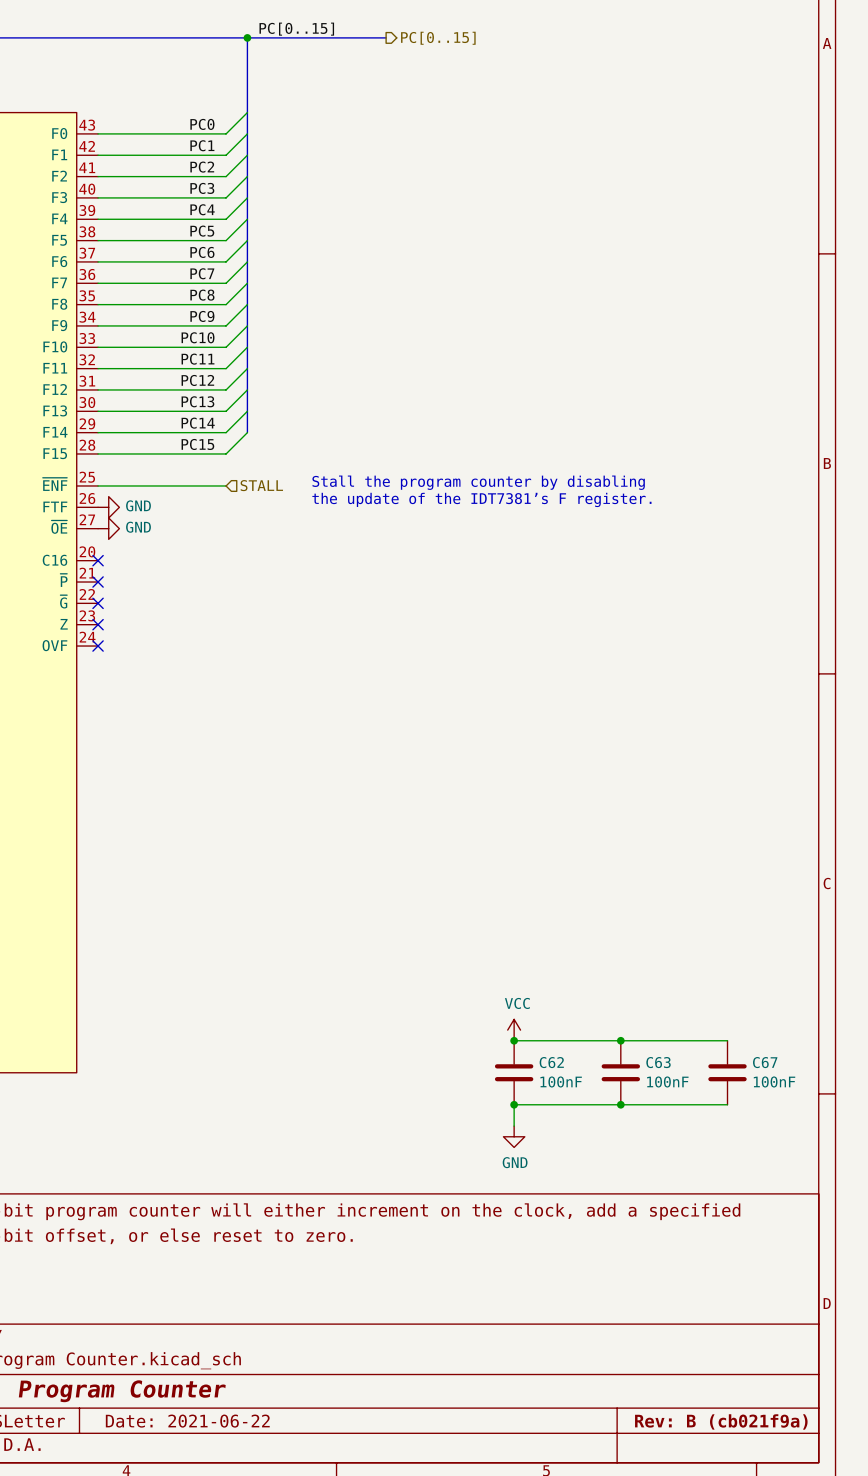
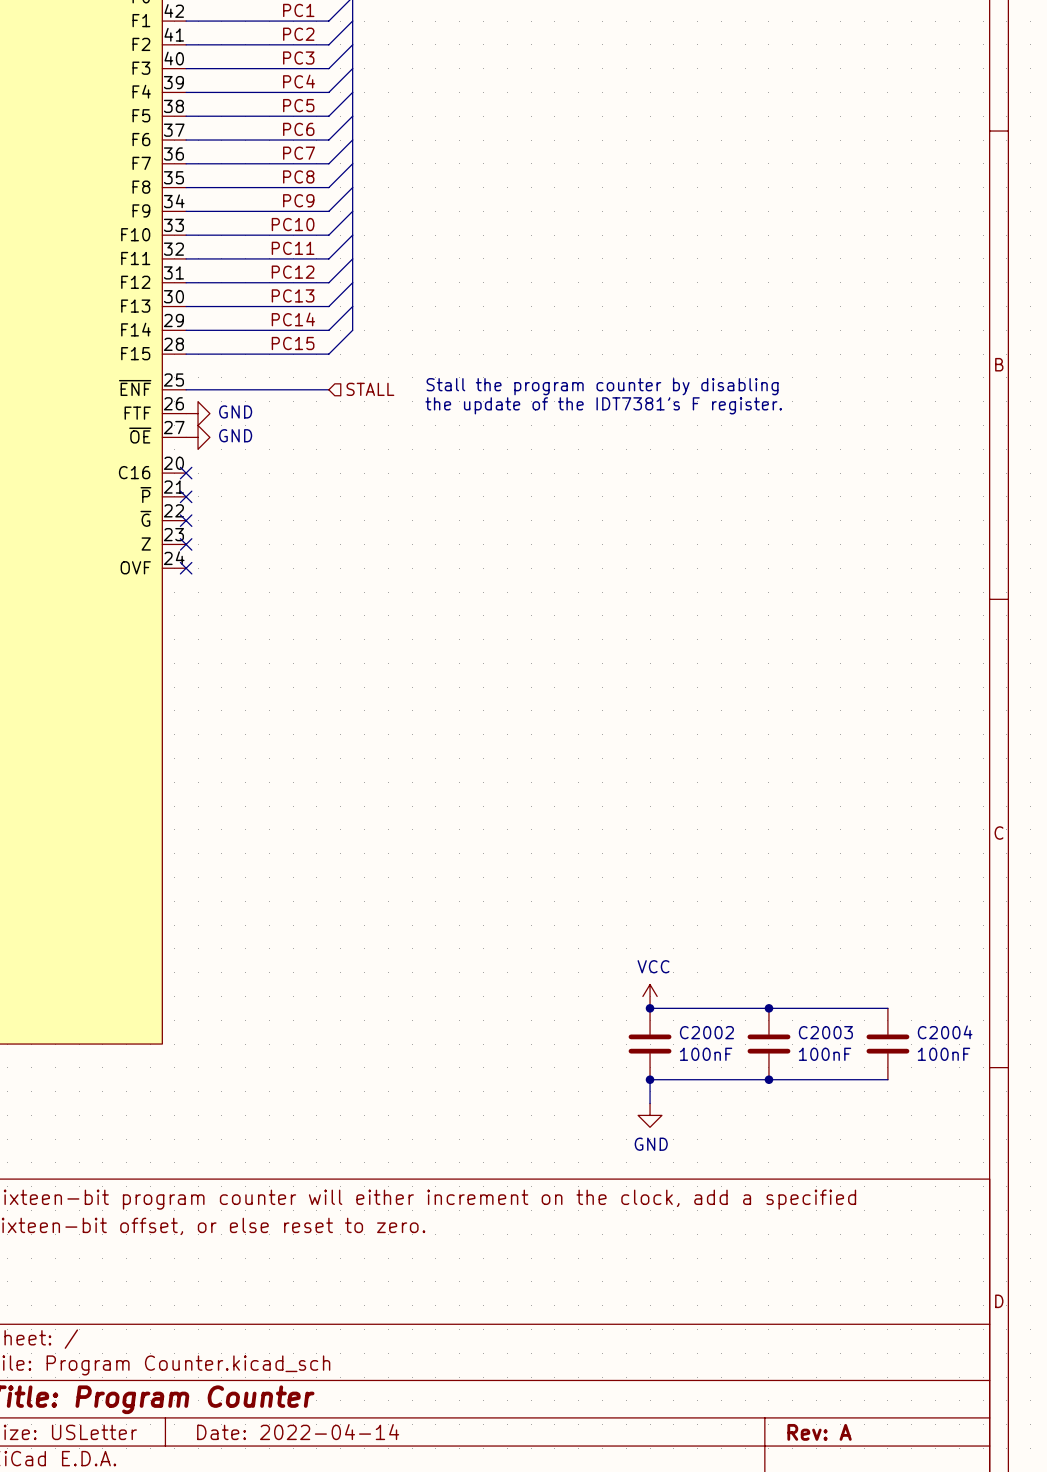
C62 name: C62 (551, 1062) -> C2002 (706, 1032)
C63 name: C63 (658, 1062) -> C2003 (825, 1032)
C67 name: C67 (765, 1062) -> C2004 (945, 1032)
title block: Date: 2021-06-22 (187, 1421) -> Date: 2022-04-14 (298, 1432)
title block: Rev: B (cb021f9a) (721, 1421) -> Rev: A (819, 1432)

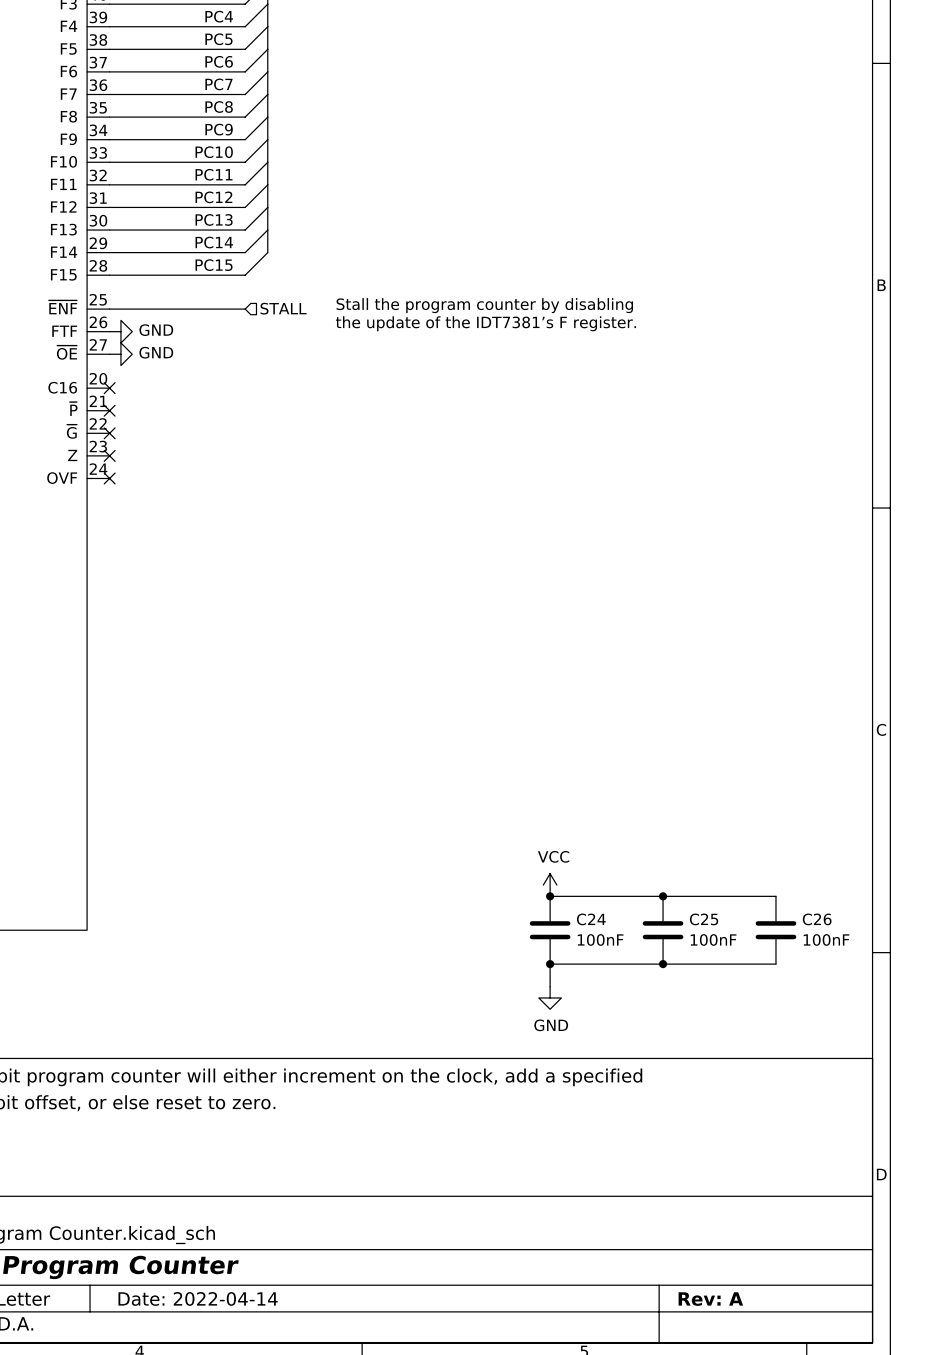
C2002 name: C2002 (706, 1032) -> C24 (591, 919)
C2003 name: C2003 (825, 1032) -> C25 (704, 919)
C2004 name: C2004 (945, 1032) -> C26 (817, 919)

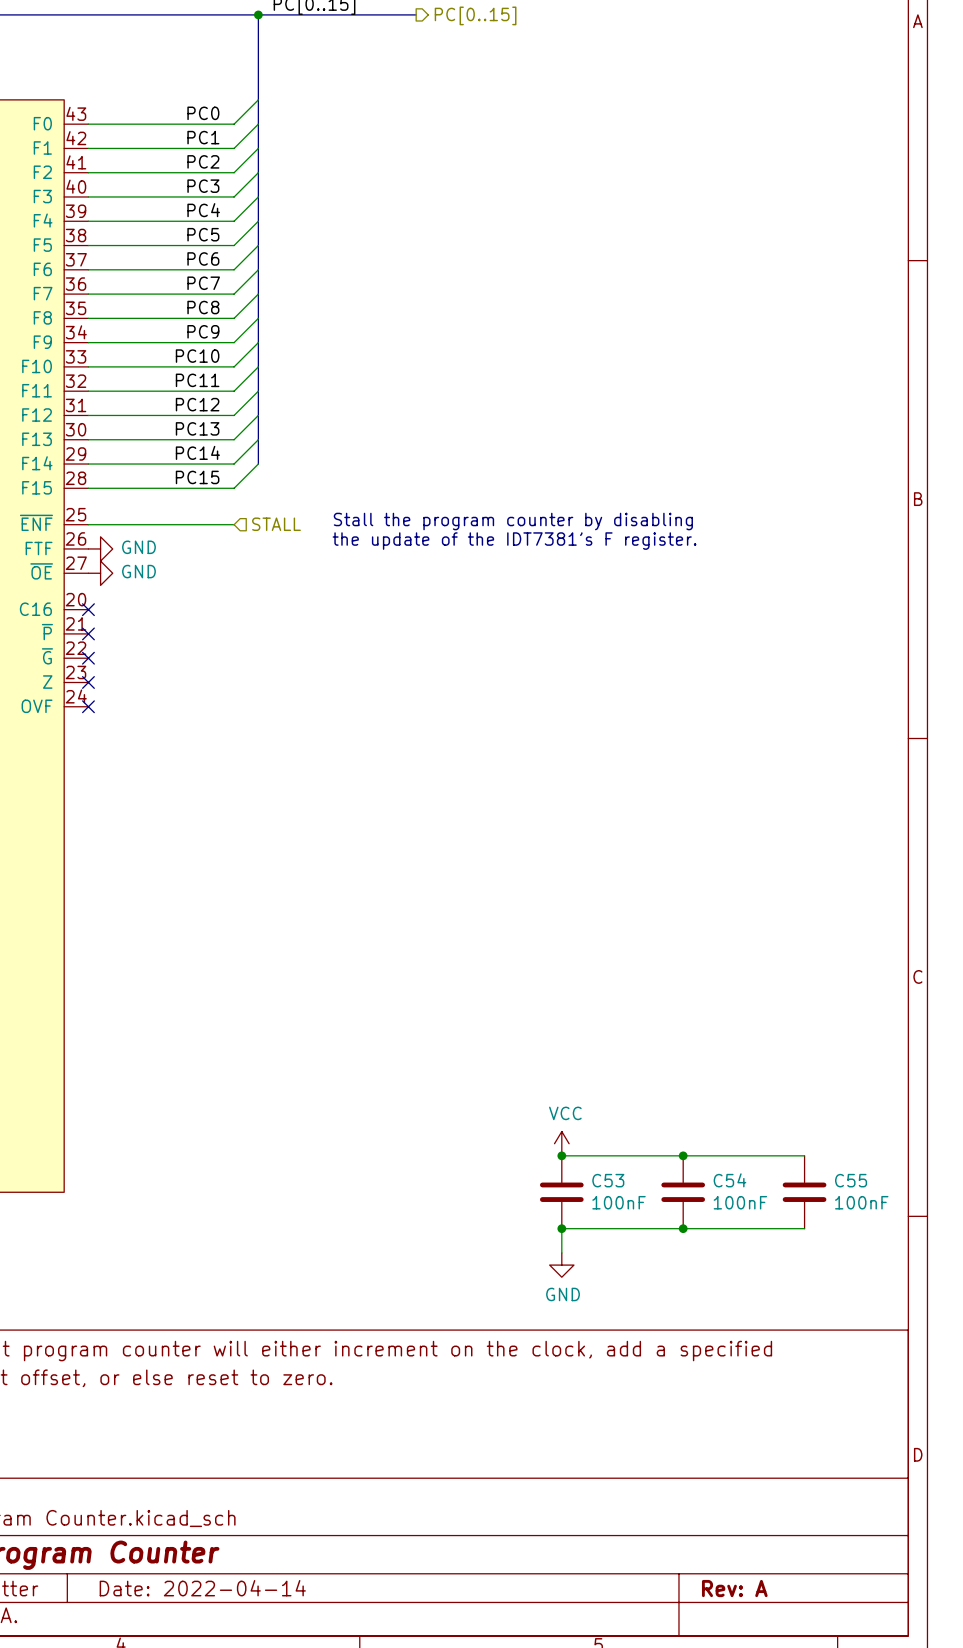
C24 name: C24 (591, 919) -> C53 (608, 1180)
C25 name: C25 (704, 919) -> C54 (729, 1180)
C26 name: C26 (817, 919) -> C55 (851, 1180)

